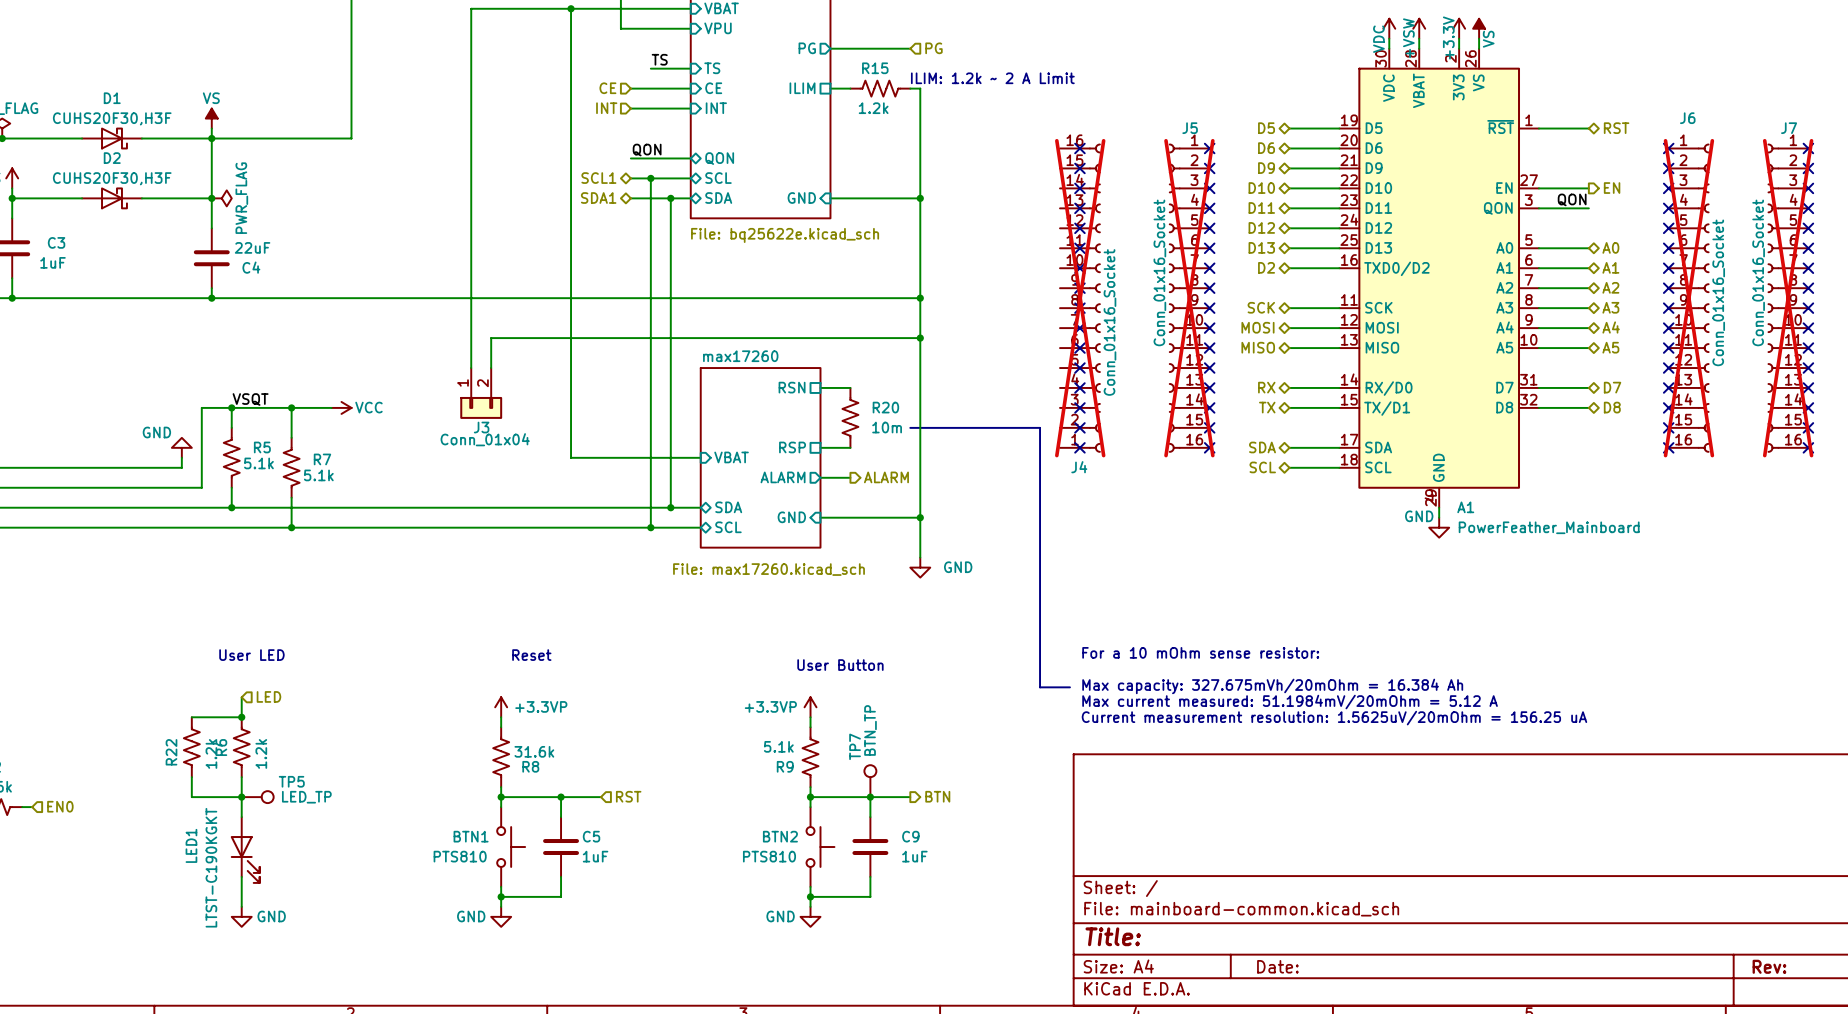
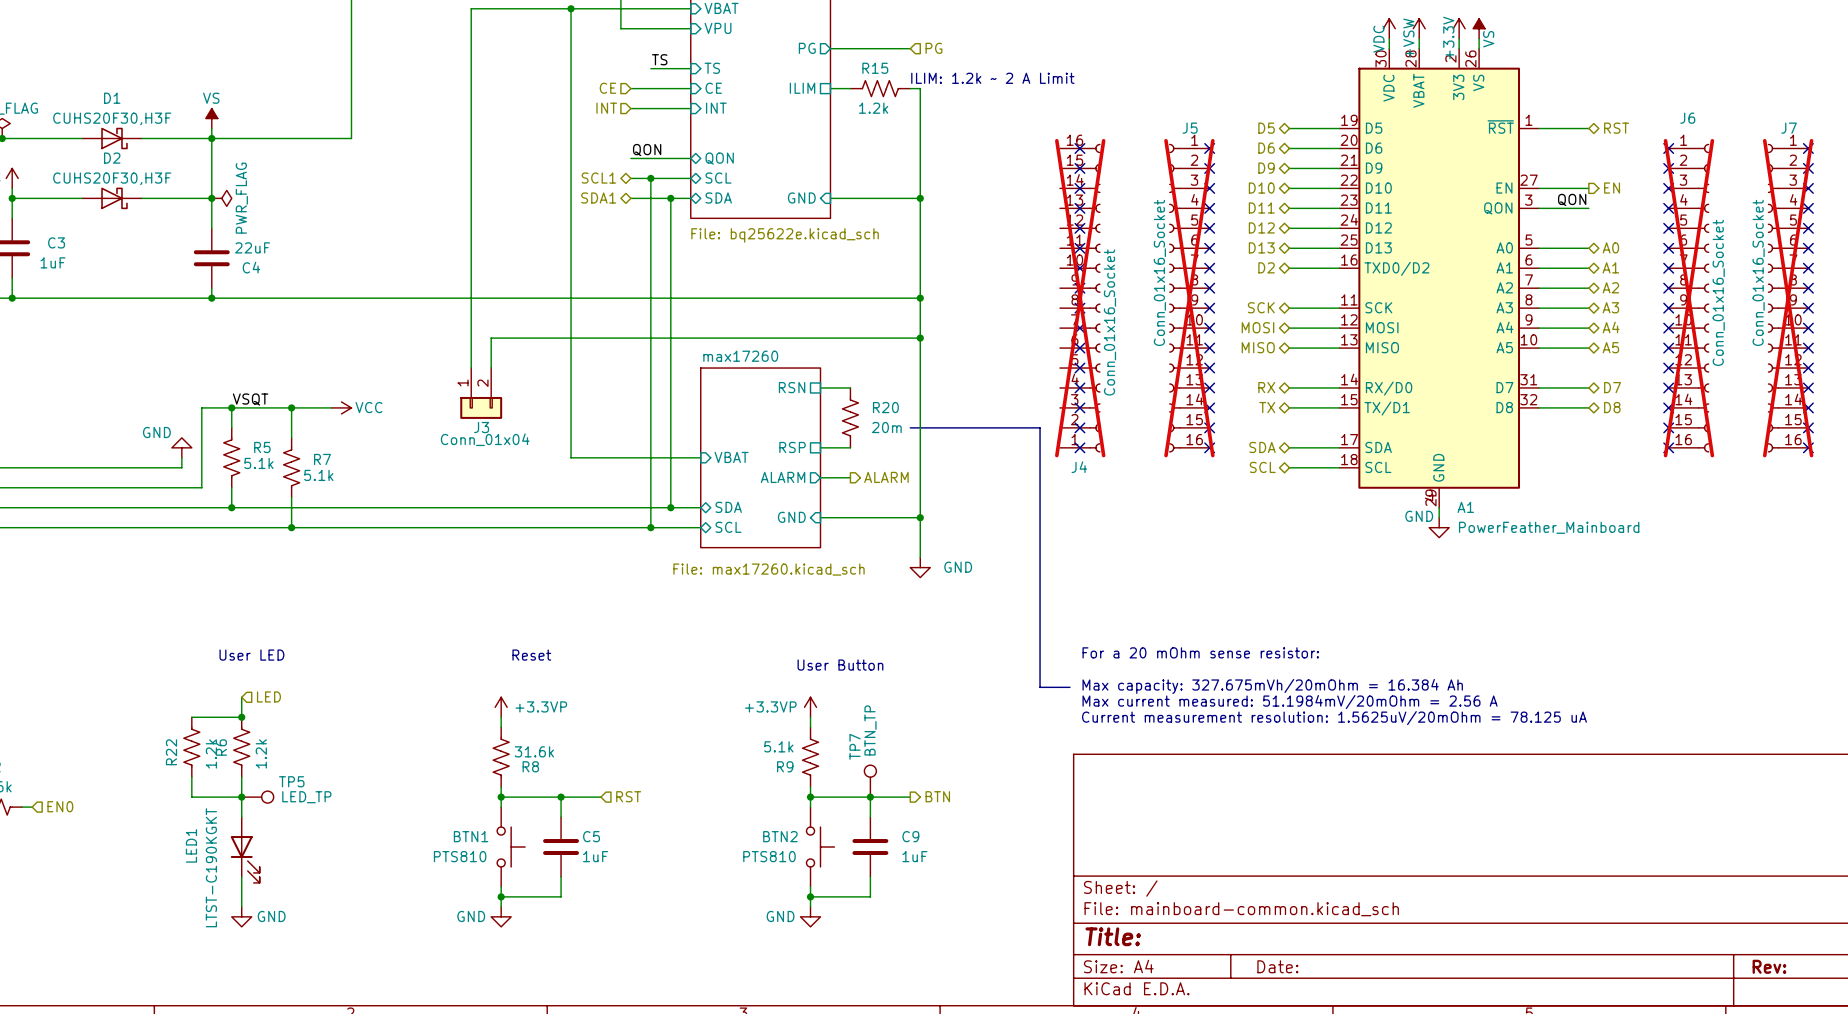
R20 value: 10m (887, 427) -> 20m (886, 427)
text: For a 10 mOhm sense resistor: (1200, 652) -> For a 20 mOhm sense resistor: (1200, 652)
text: Max current measured: 51.1984mV/20mOhm = 5.12 A (1290, 702) -> Max current measured: 51.1984mV/20mOhm = 2.56 A (1290, 702)
text: Current measurement resolution: 1.5625uV/20mOhm = 156.25 uA (1334, 718) -> Current measurement resolution: 1.5625uV/20mOhm = 78.125 uA (1334, 718)

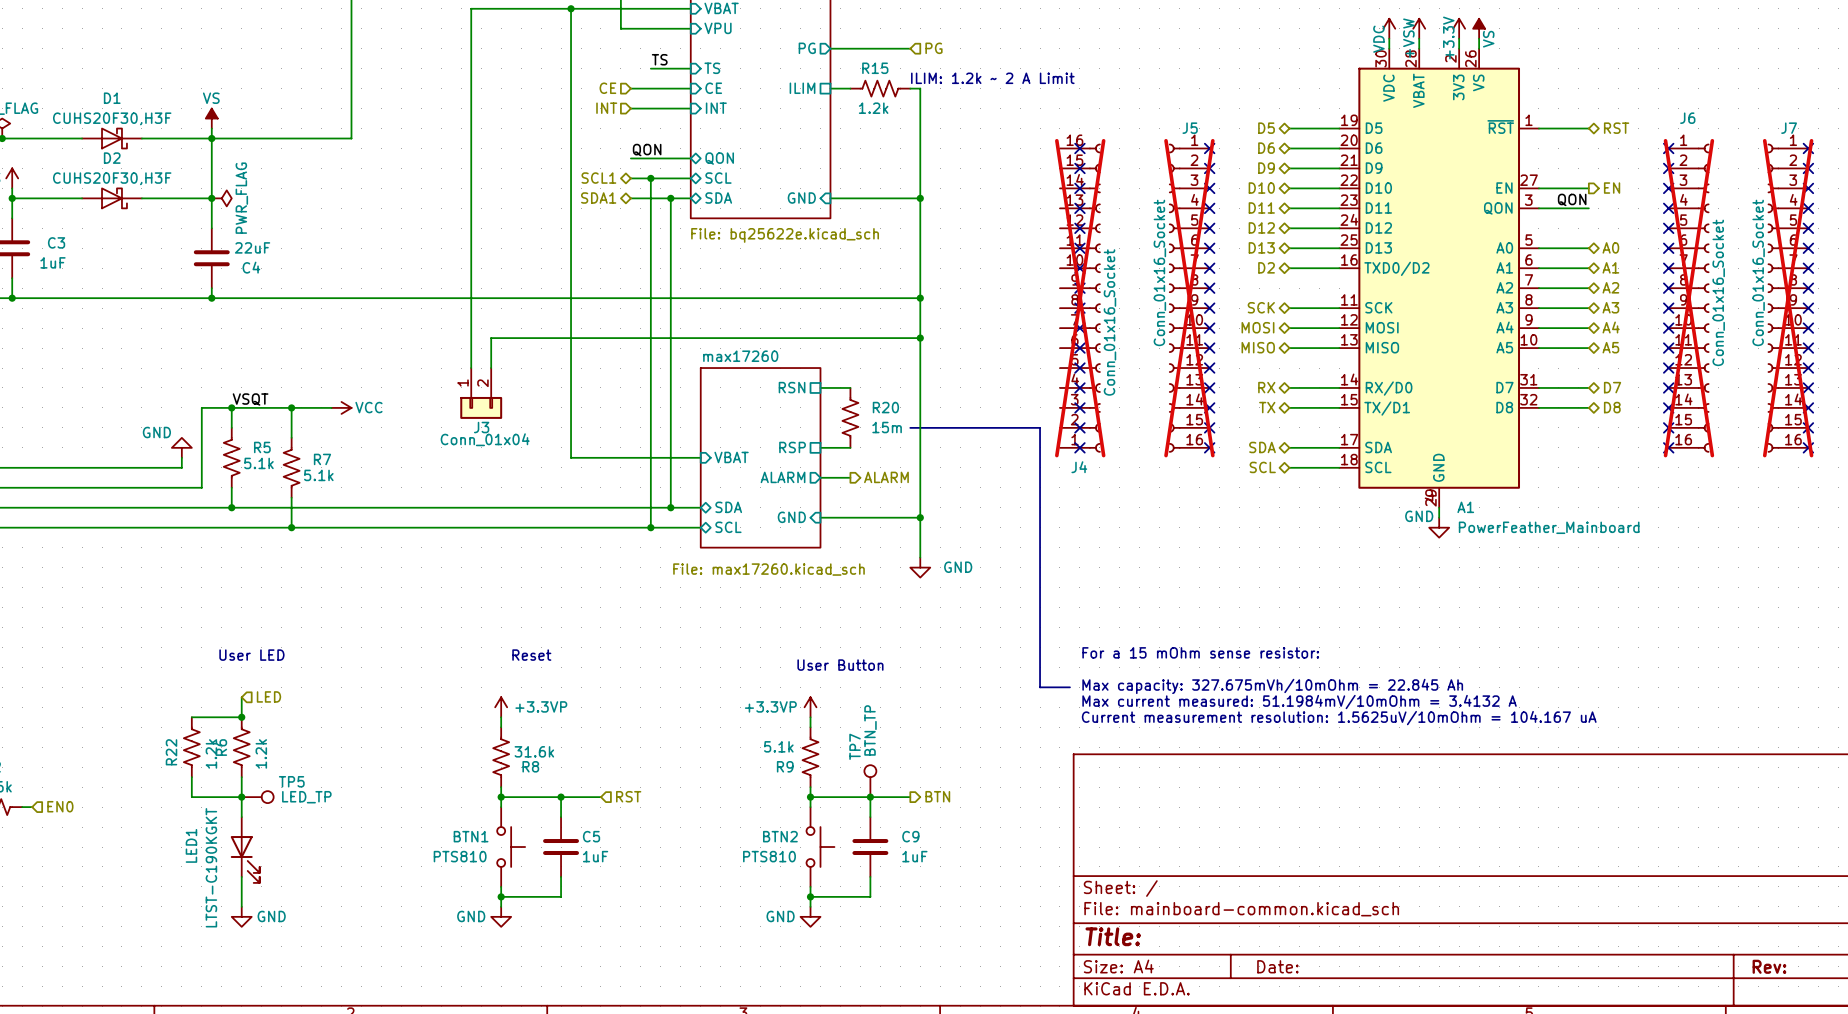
R20 value: 20m (886, 427) -> 15m (887, 427)
text: For a 20 mOhm sense resistor: (1200, 652) -> For a 15 mOhm sense resistor: (1200, 652)
text: Max capacity: 327.675mVh/20mOhm = 16.384 Ah (1272, 686) -> Max capacity: 327.675mVh/10mOhm = 22.845 Ah (1272, 686)
text: Max current measured: 51.1984mV/20mOhm = 2.56 A (1290, 702) -> Max current measured: 51.1984mV/10mOhm = 3.4132 A (1299, 702)
text: Current measurement resolution: 1.5625uV/20mOhm = 78.125 uA (1334, 718) -> Current measurement resolution: 1.5625uV/10mOhm = 104.167 uA (1339, 718)

